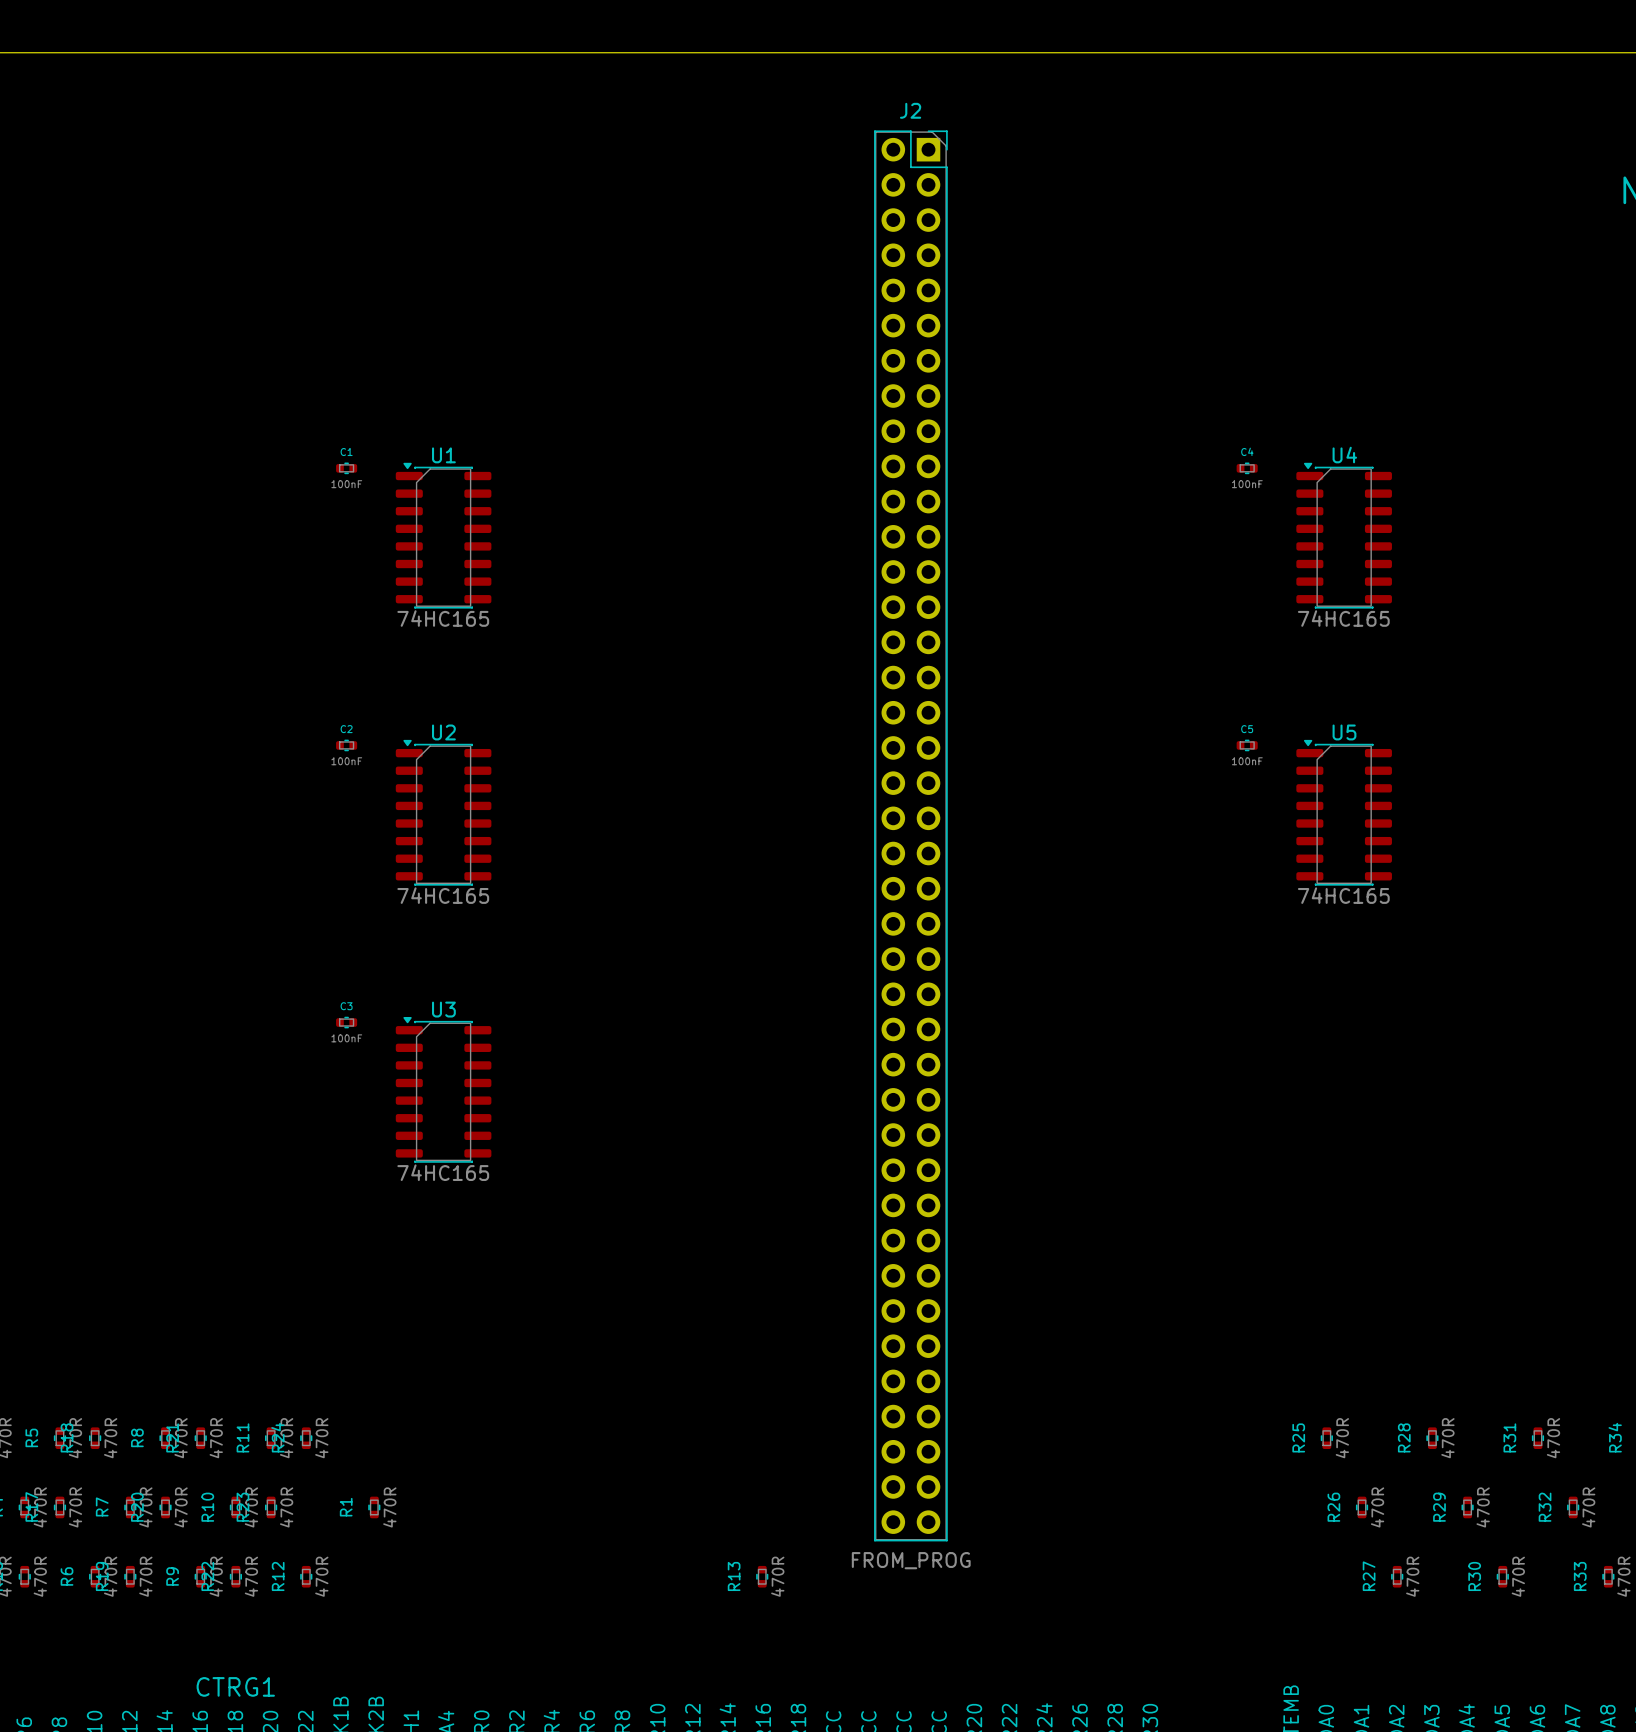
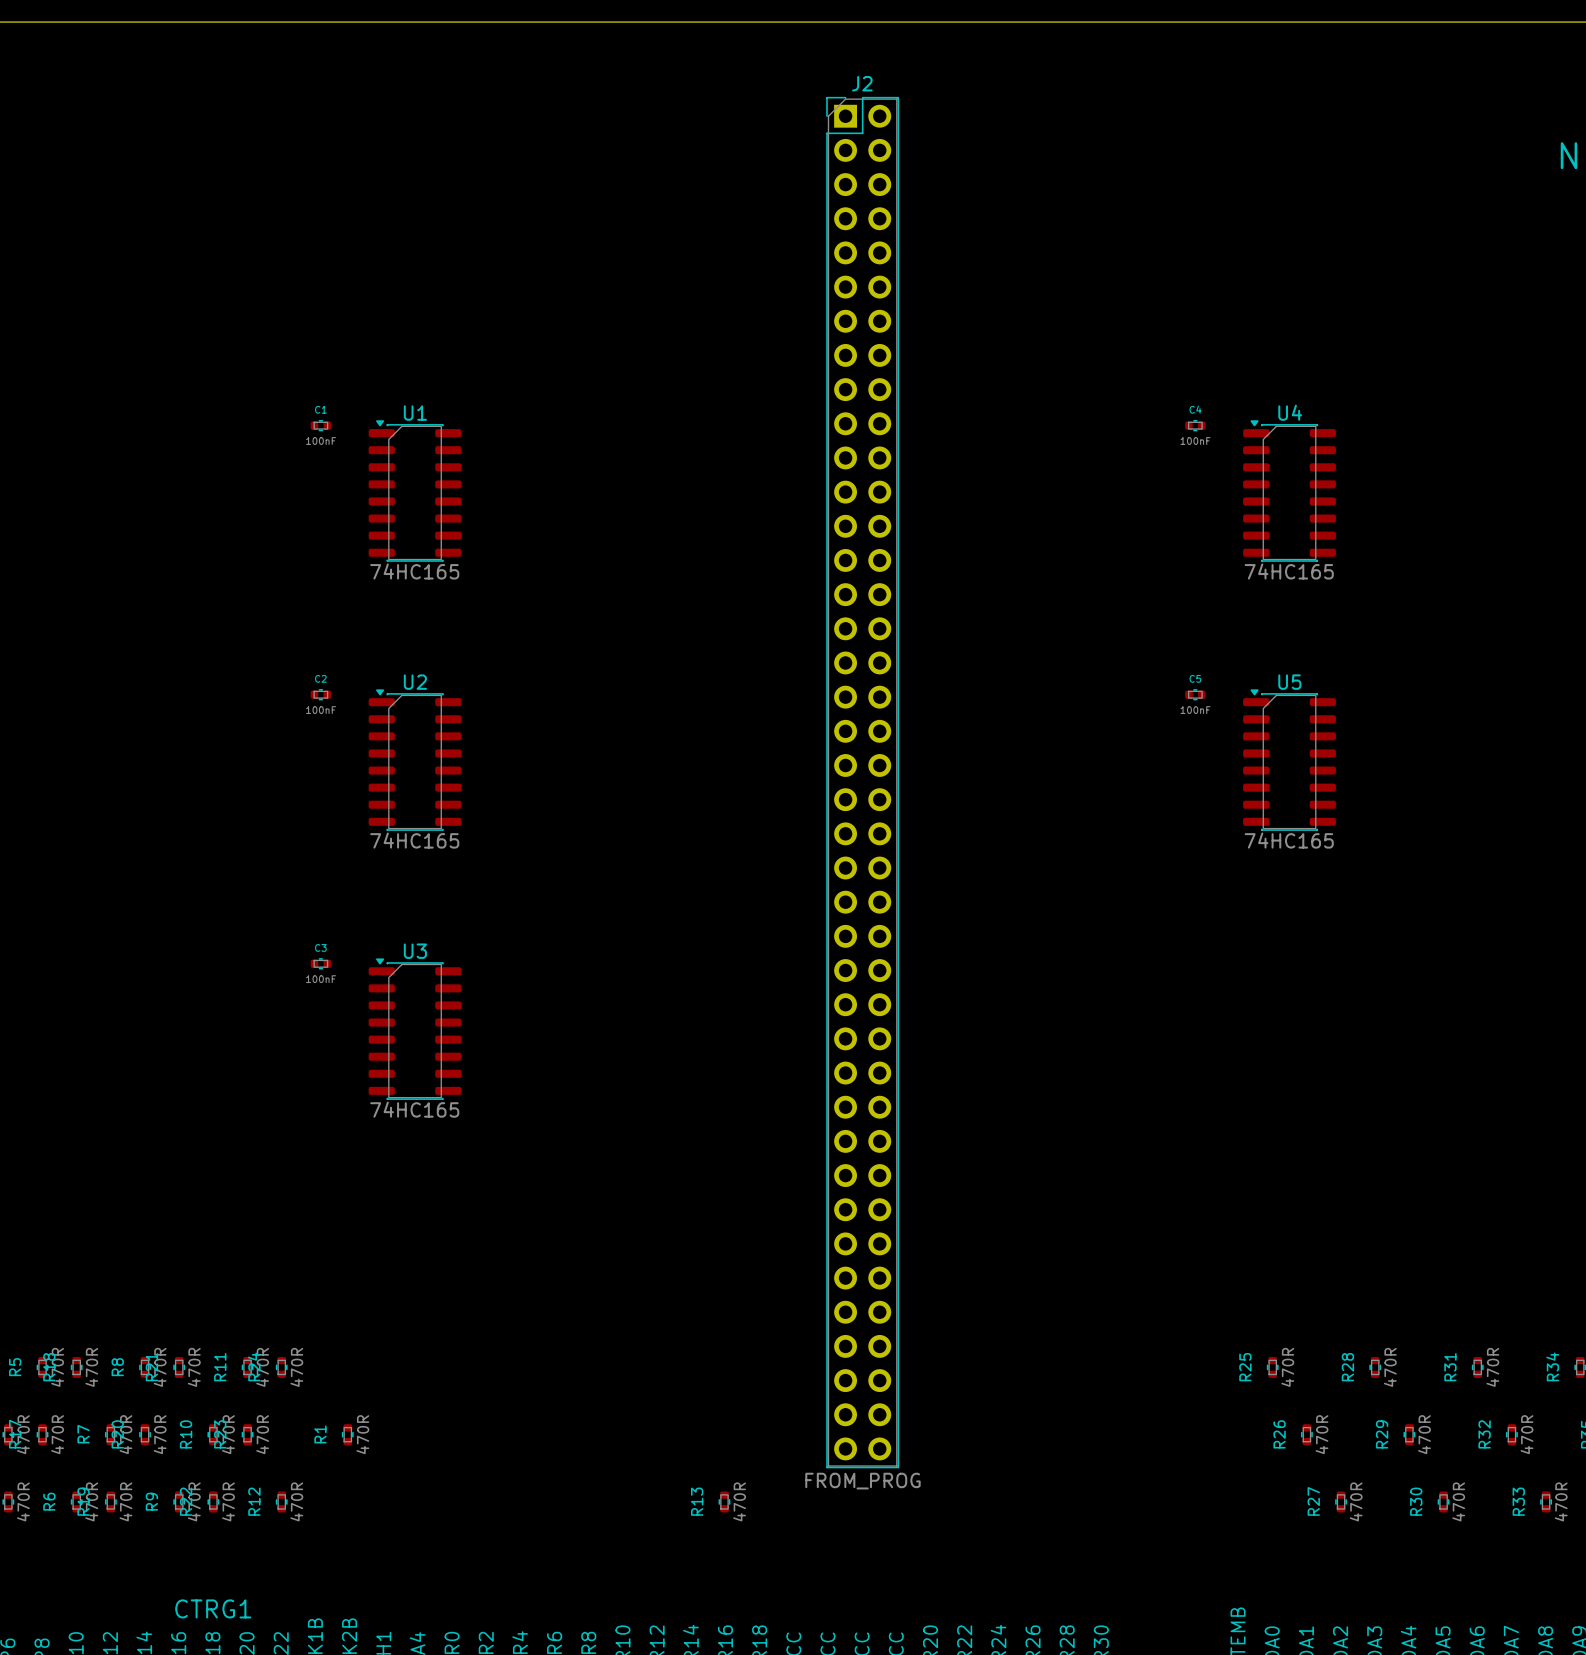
J2 footprint: [874, 130, 948, 1542] -> [826, 96, 900, 1469]

